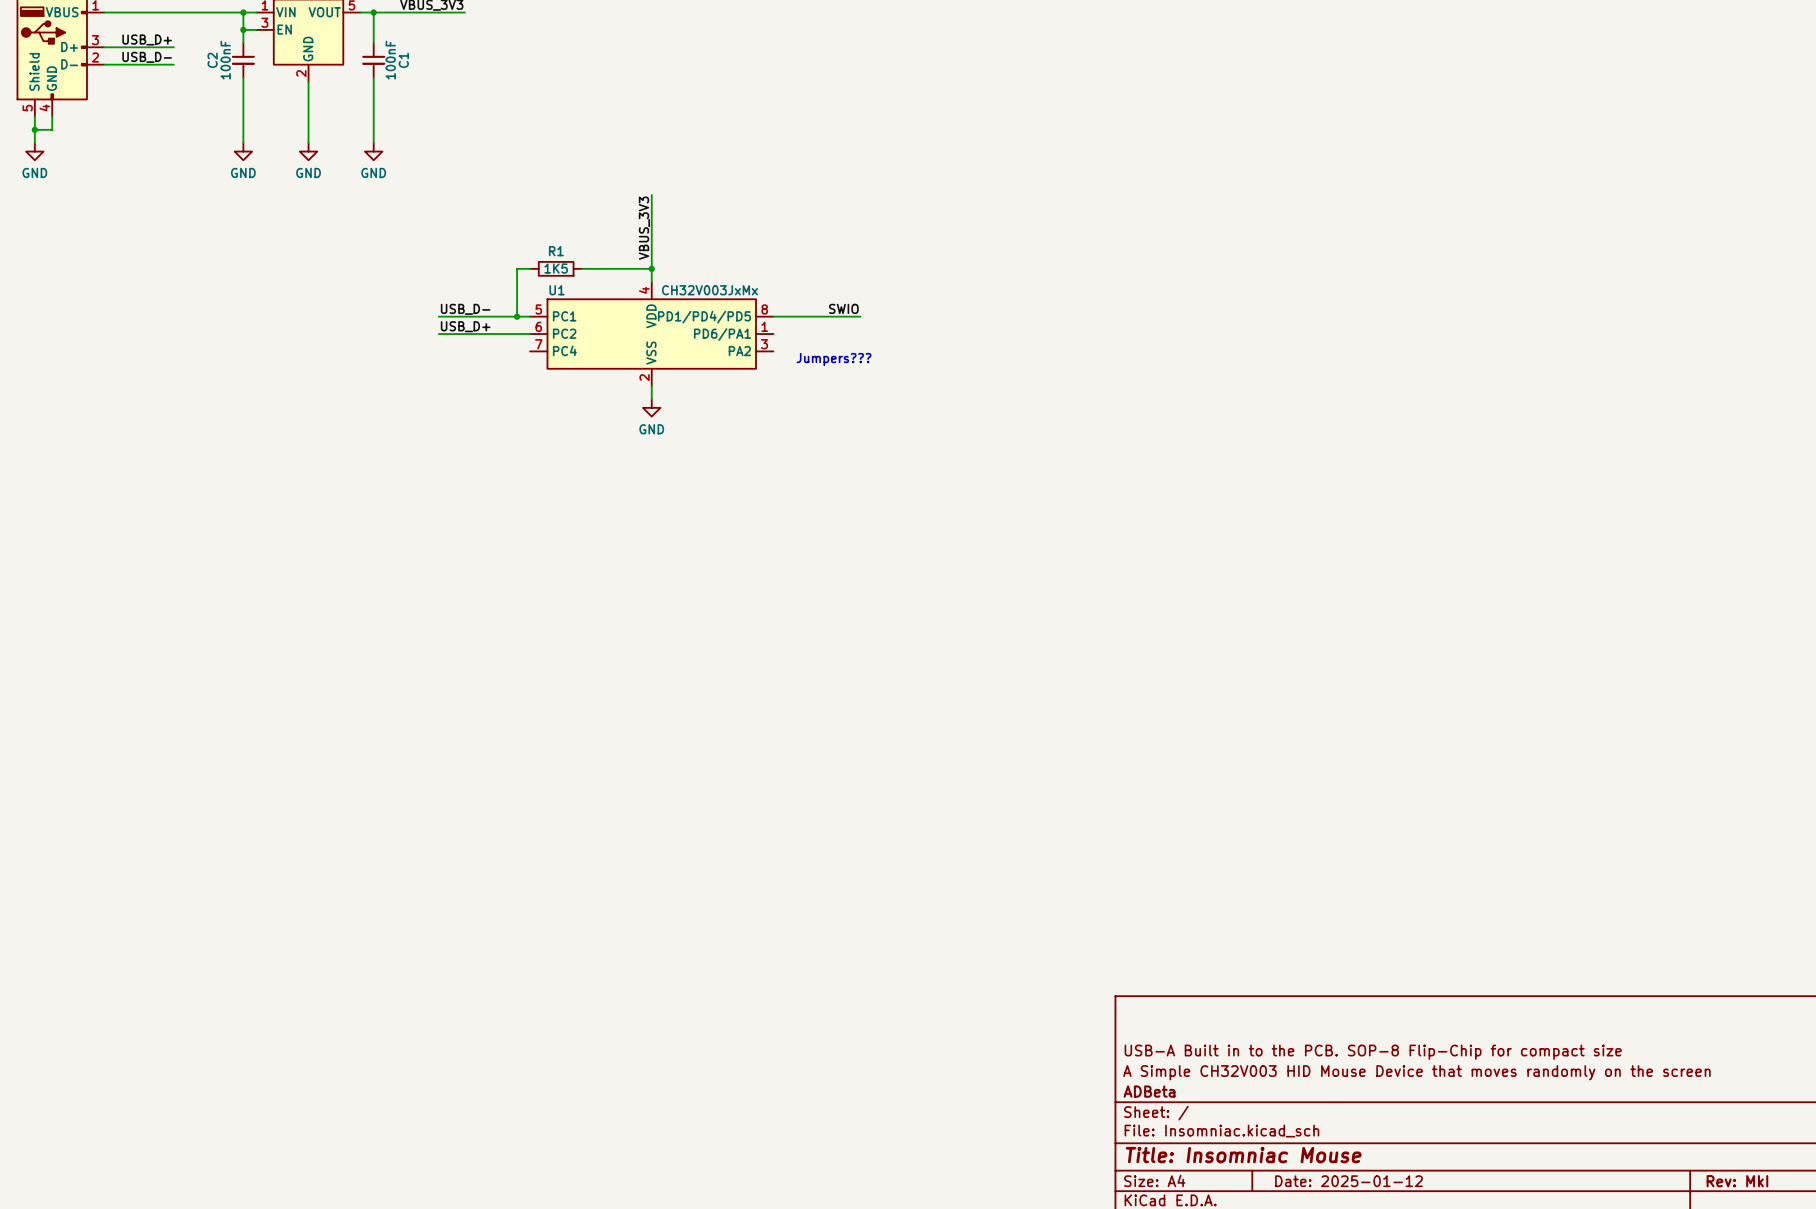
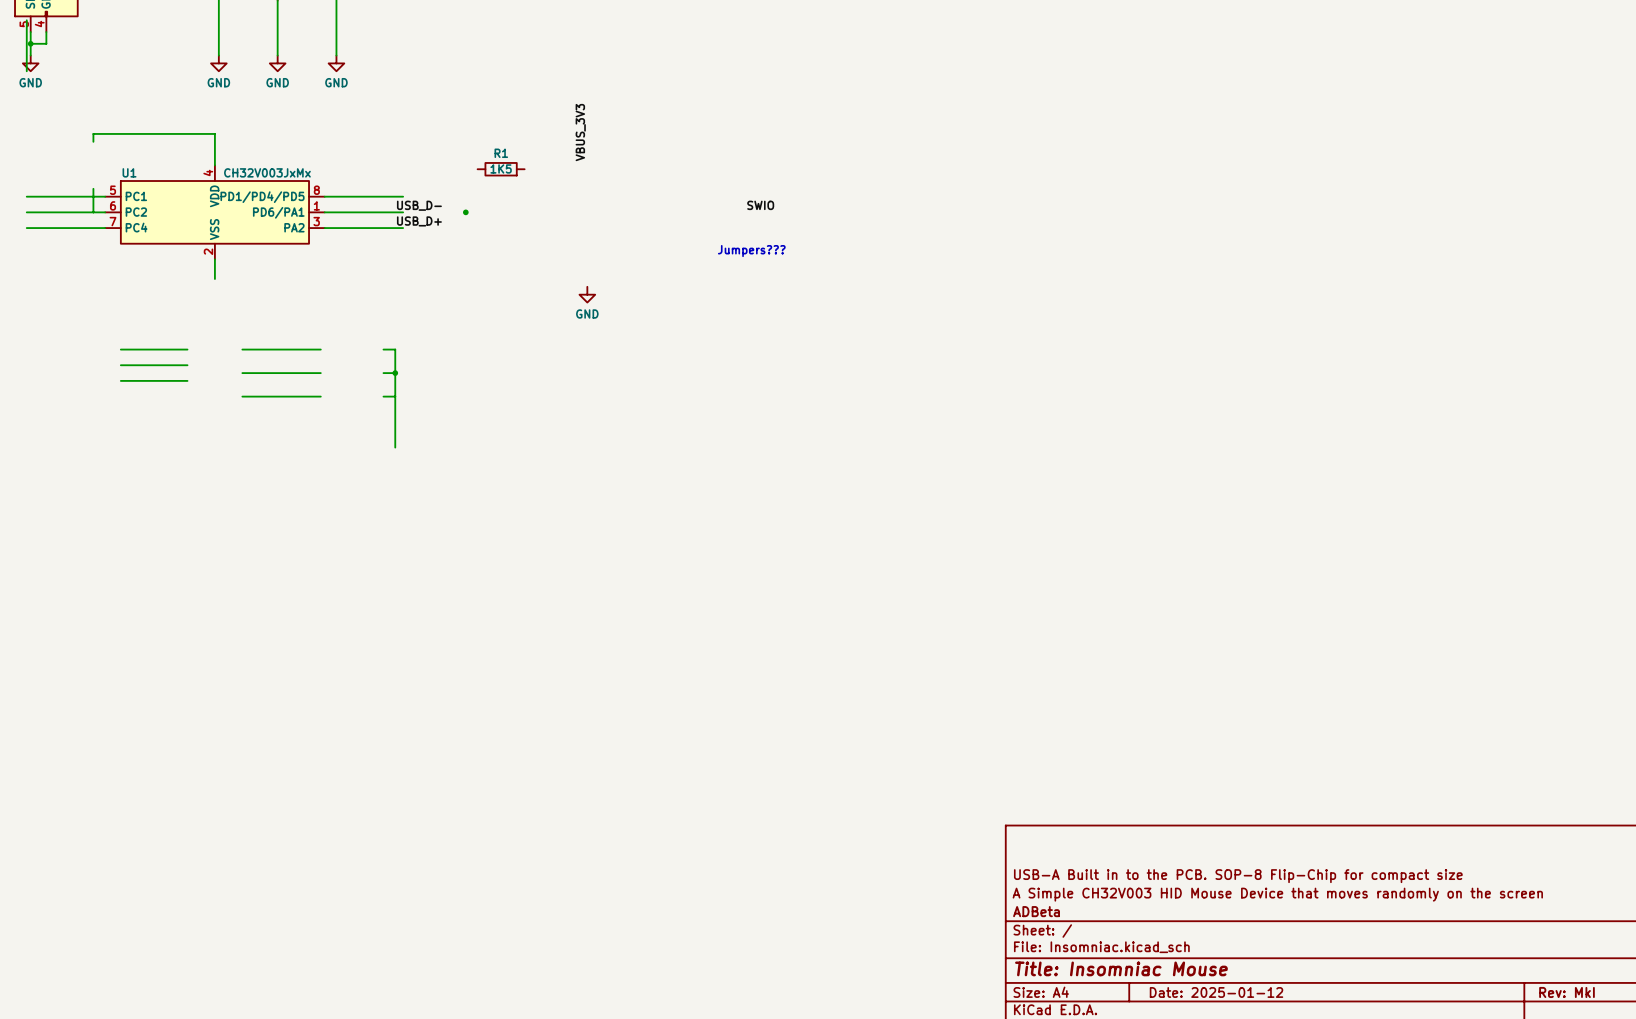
wire: none -> (26, 20) (26, 71)
wire: (651, 195) (651, 281) -> none
wire: none -> (93, 141) (93, 133) (214, 133) (214, 165)
wire: (530, 268) (517, 268) (517, 316) -> none
wire: (582, 268) (651, 268) -> none
junction: (651, 268) -> none
wire: none -> (93, 188) (93, 212)
wire: none -> (26, 196) (105, 196)
wire: none -> (324, 196) (403, 196)
wire: none -> (26, 212) (105, 212)
wire: none -> (324, 212) (395, 212)
wire: (447, 316) (530, 316) -> none
wire: (773, 316) (860, 316) -> none
wire: none -> (26, 228) (105, 228)
wire: none -> (324, 228) (395, 228)
wire: (447, 334) (530, 334) -> none
U1 position: (651, 334) -> (214, 212)
wire: none -> (214, 259) (214, 279)
wire: (651, 386) (651, 399) -> none
wire: none -> (120, 349) (187, 349)
wire: none -> (242, 349) (320, 349)
wire: none -> (383, 349) (395, 349) (395, 447)
wire: none -> (120, 365) (187, 365)
wire: none -> (242, 373) (320, 373)
wire: none -> (383, 373) (395, 373)
junction: none -> (395, 373)
wire: none -> (120, 380) (187, 380)
wire: none -> (242, 396) (320, 396)
wire: none -> (383, 396) (395, 396)

